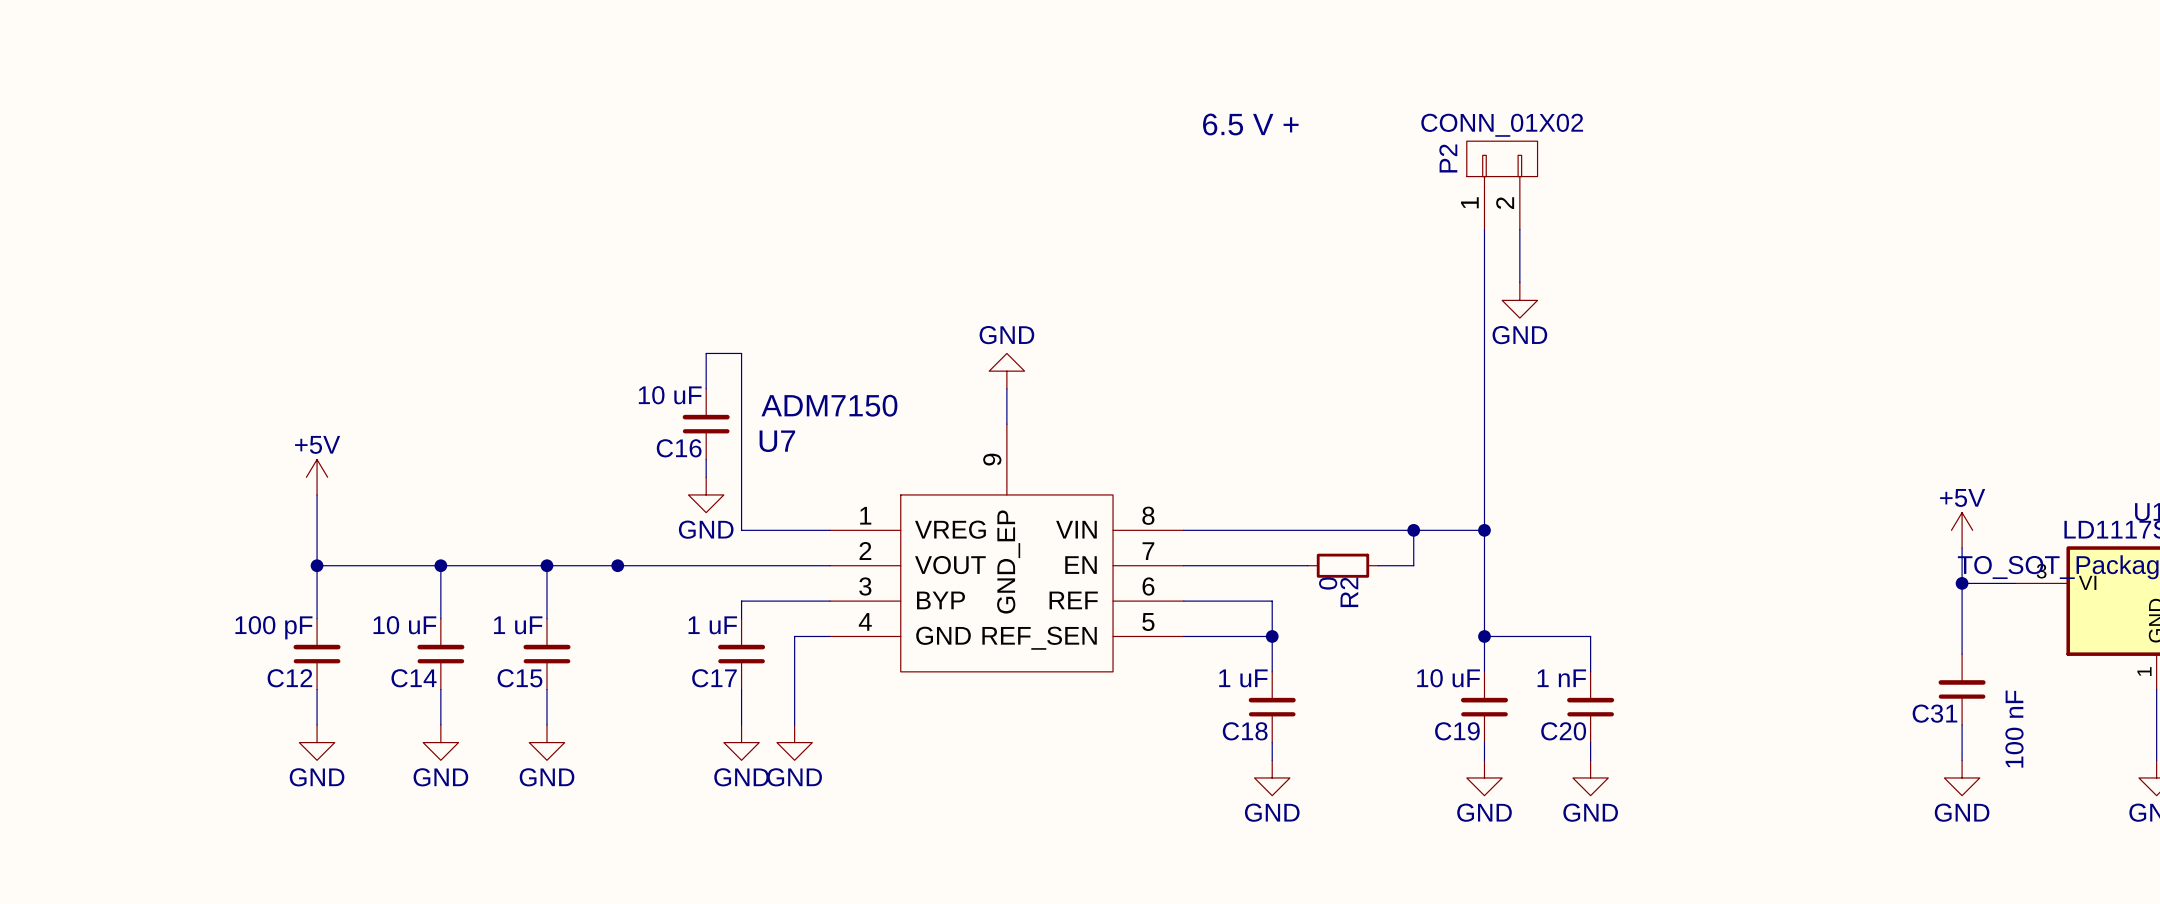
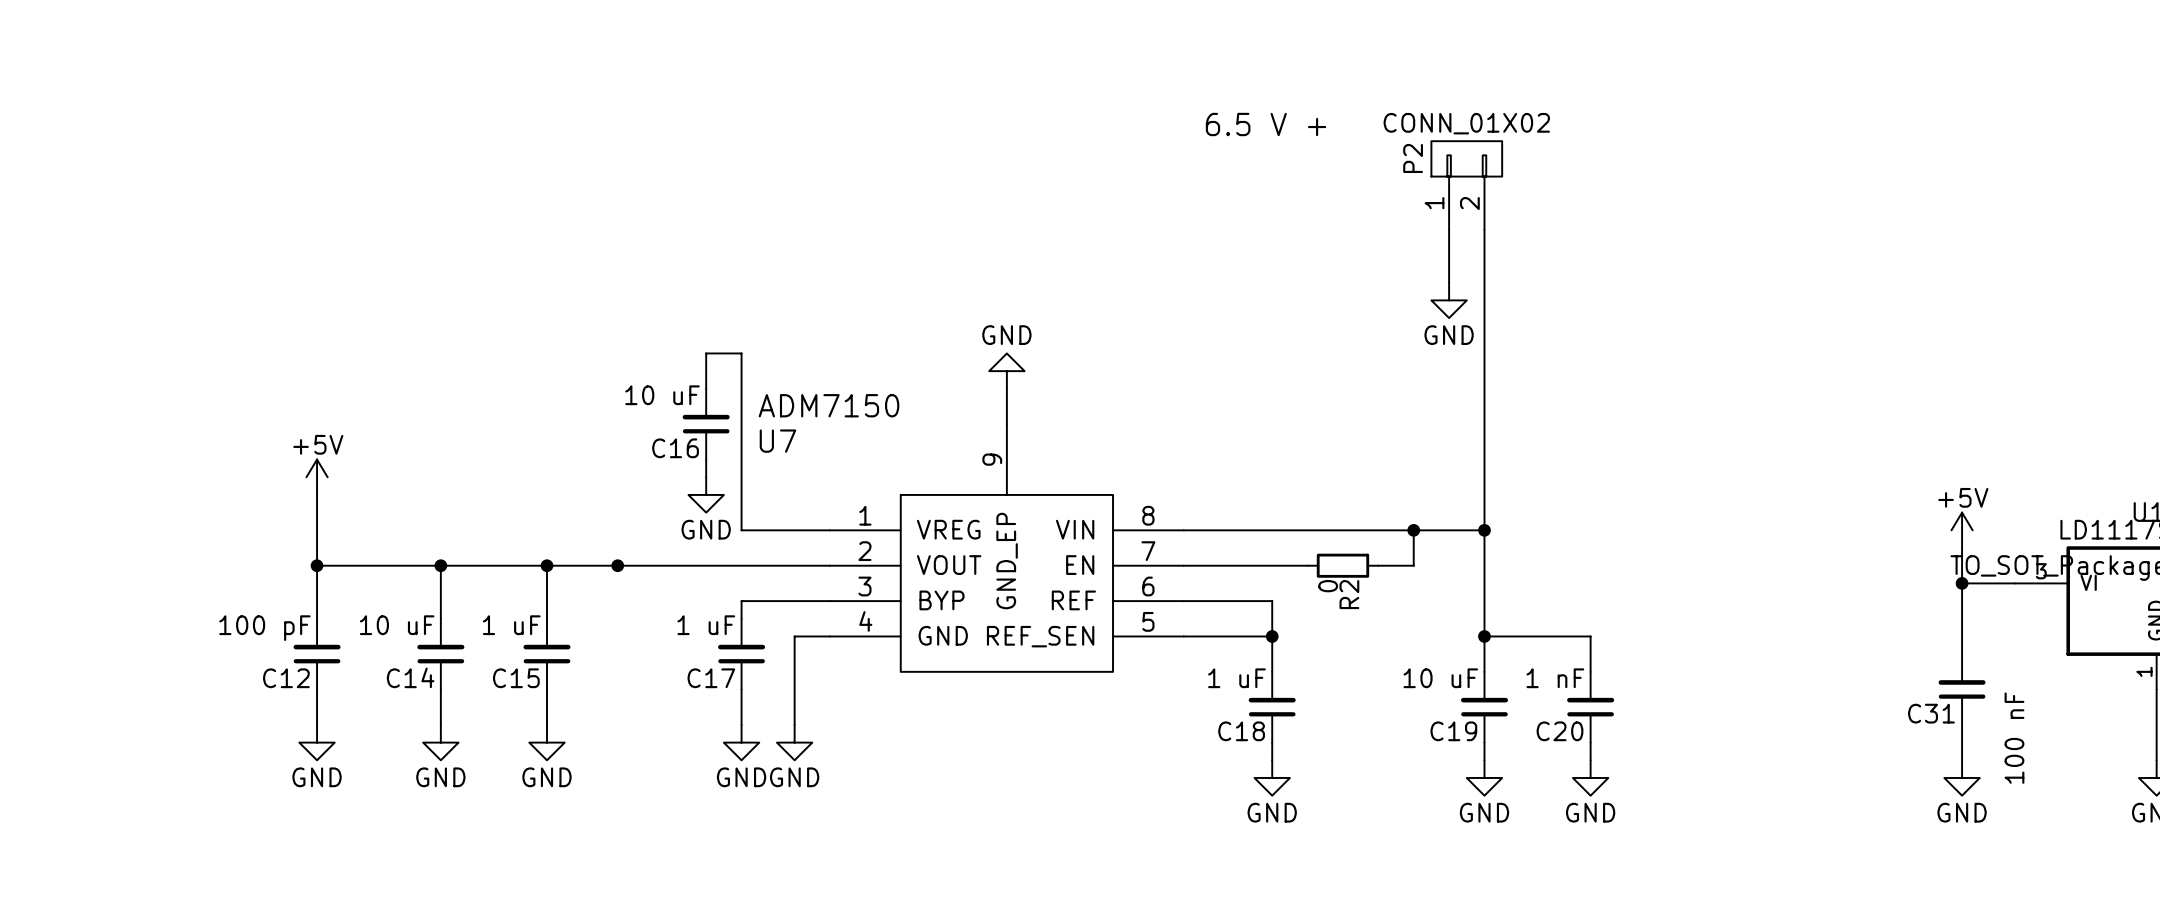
P2 position: (1502, 185) -> (1466, 185)
wire: (1519, 229) (1519, 282) -> (1449, 229) (1449, 282)
power symbol position: GND (1519, 300) -> GND (1449, 300)

